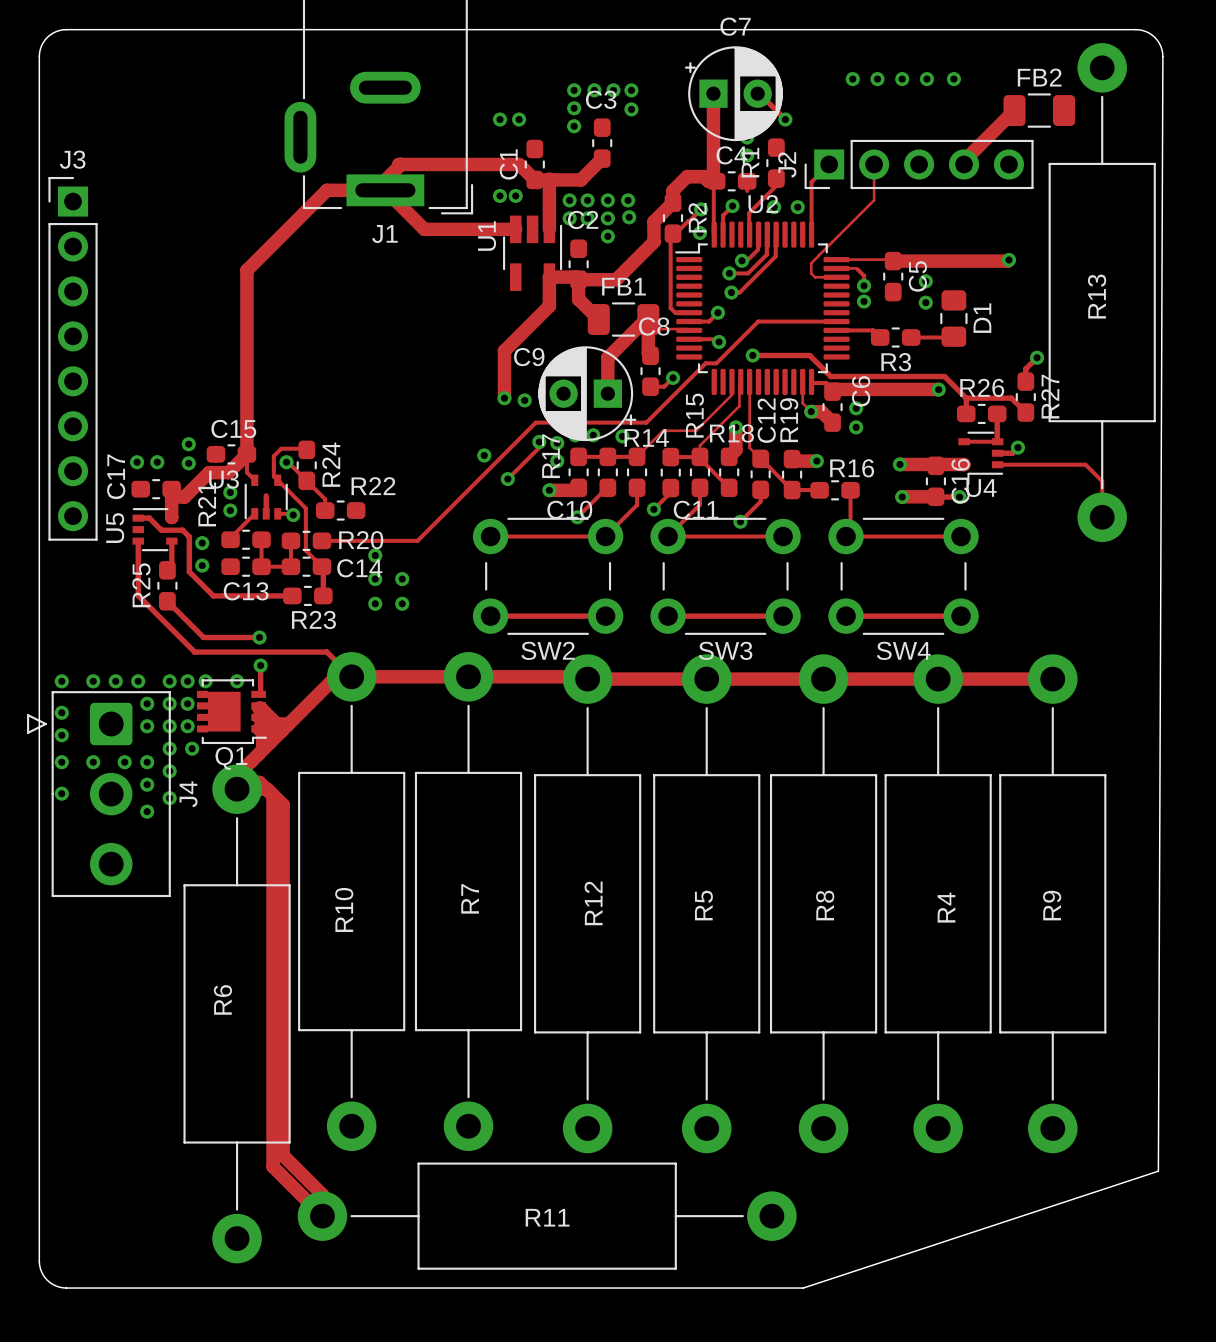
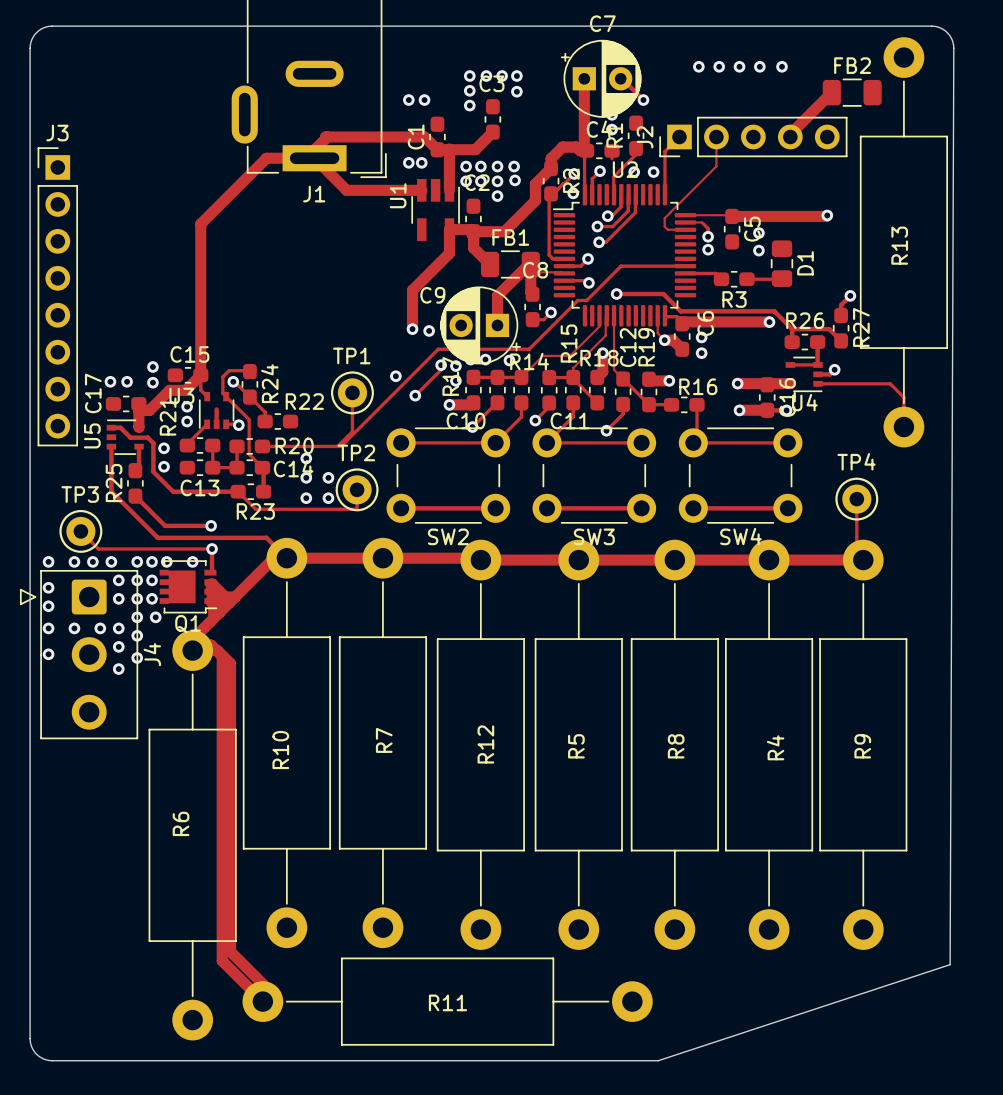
track: none -> (352, 392) (352, 431) (337, 446)
TP1: none -> (352, 392)
track: none -> (357, 489) (357, 509) (255, 509) (238, 491)
TP2: none -> (357, 489)
track: none -> (856, 499) (856, 553) (863, 560)
TP4: none -> (856, 499)
track: none -> (80, 531) (98, 548) (212, 548)
TP3: none -> (80, 531)

